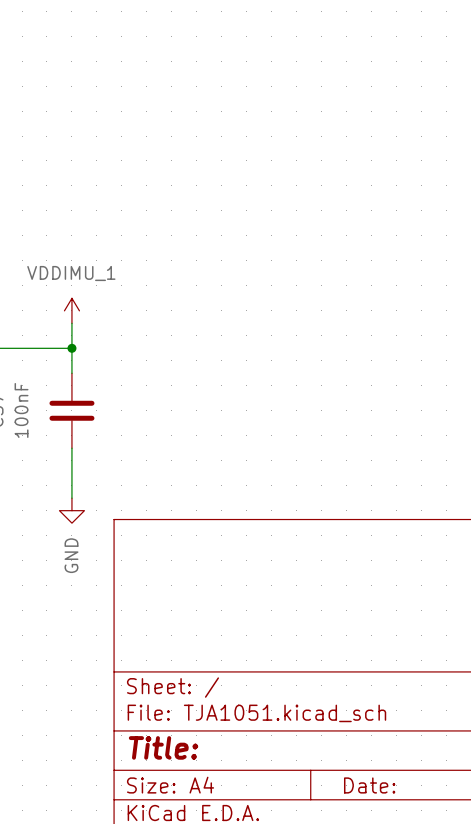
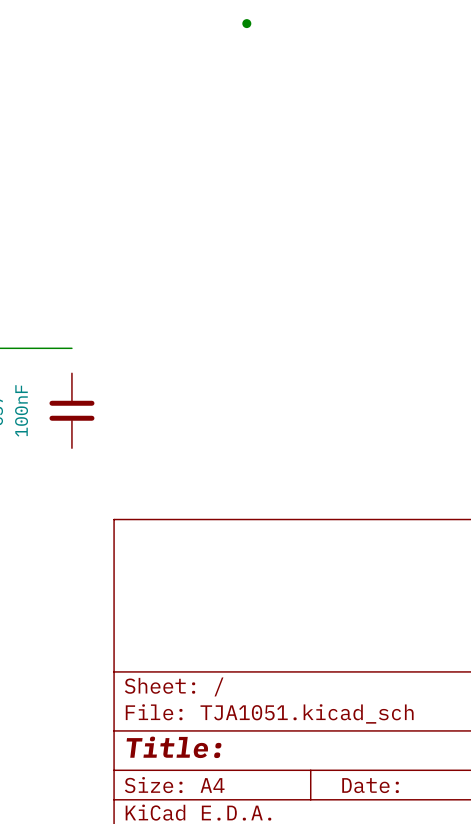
junction: none -> (246, 23)
power symbol: VDDIMU_1 (71, 310) -> none
wire: (71, 323) (71, 373) -> none
junction: (71, 348) -> none
wire: (71, 448) (71, 498) -> none
power symbol: GND (71, 510) -> none

